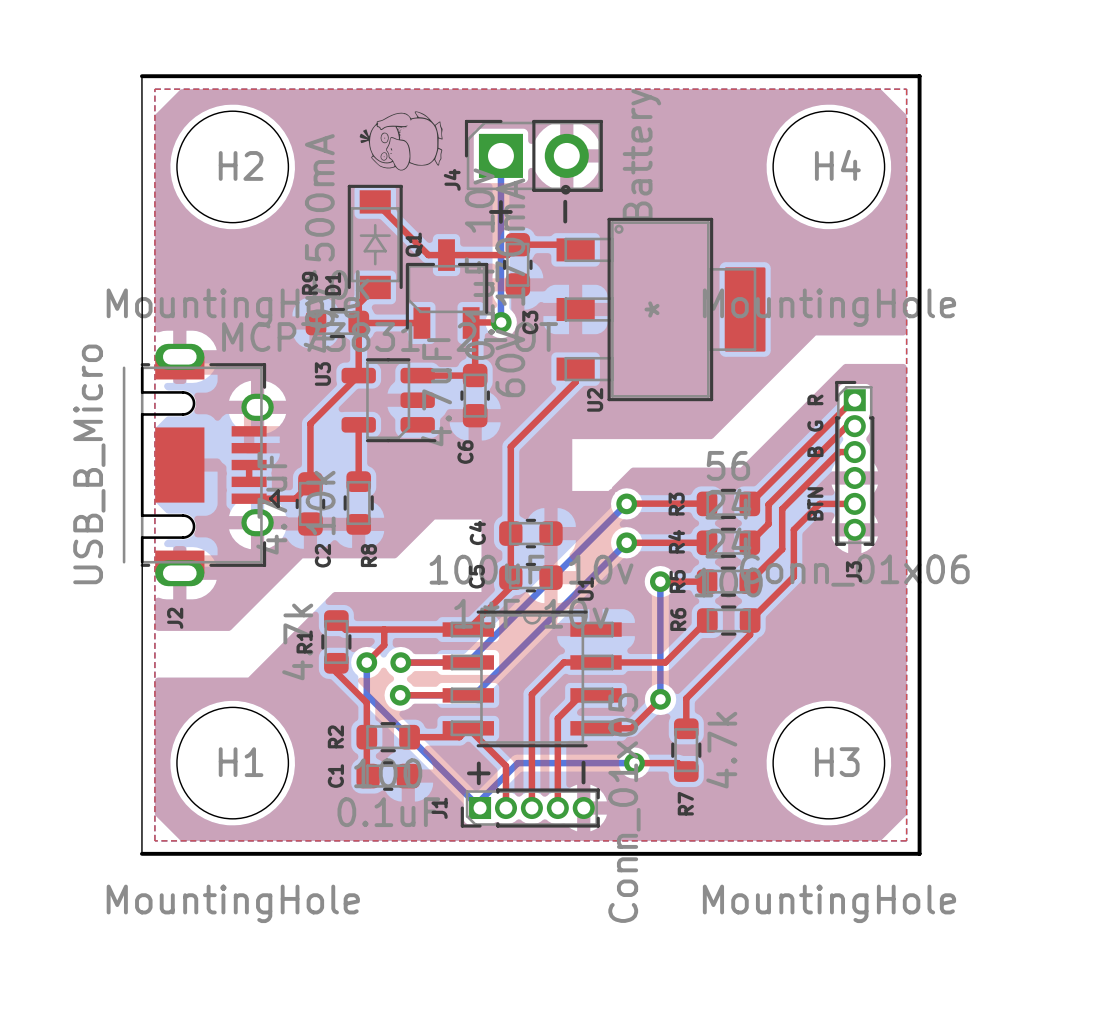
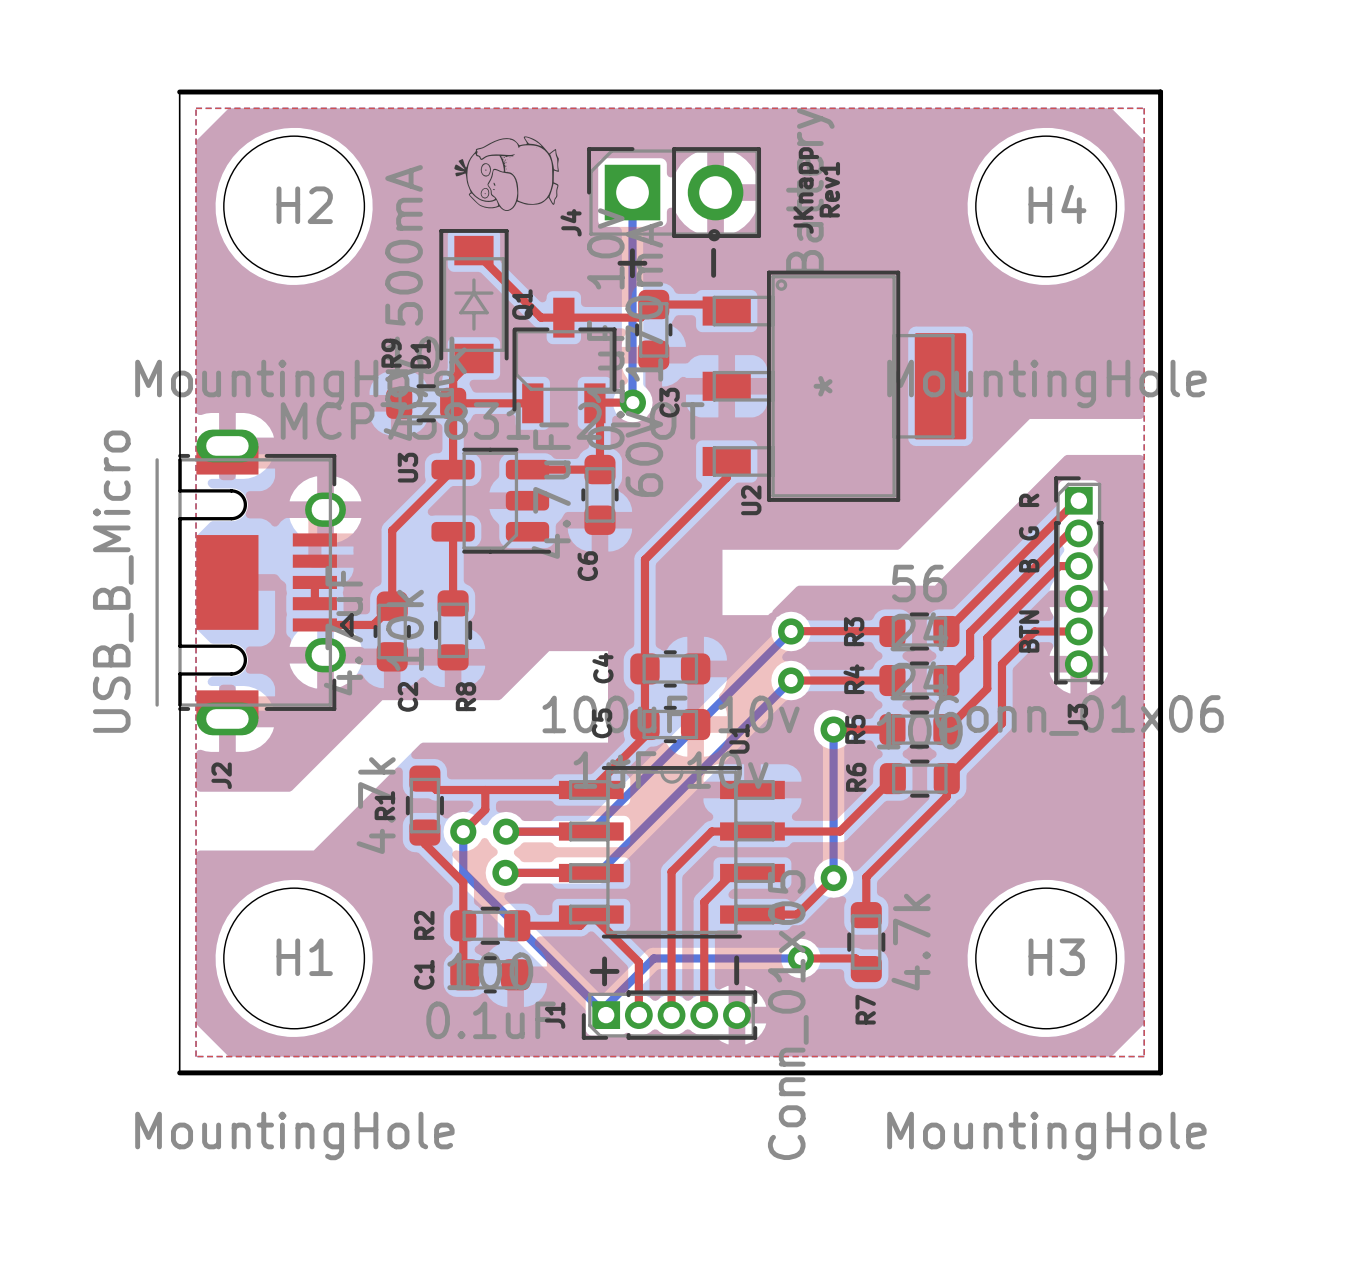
text: none -> Rev1 (829, 189)
text: none -> JKnapp (806, 190)

